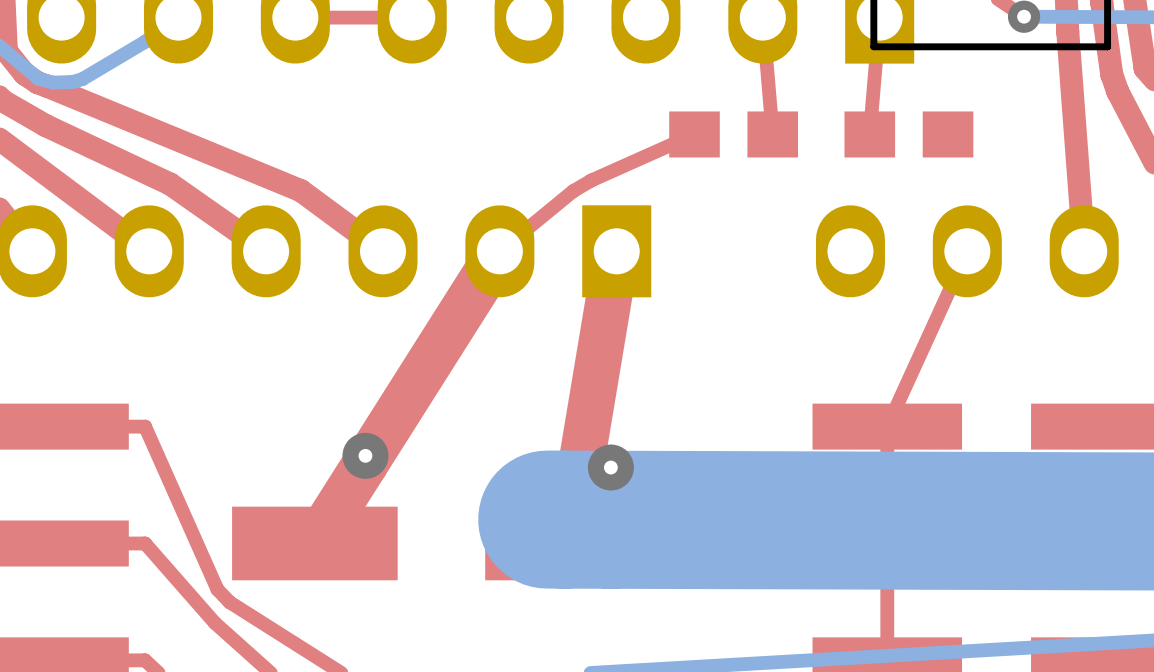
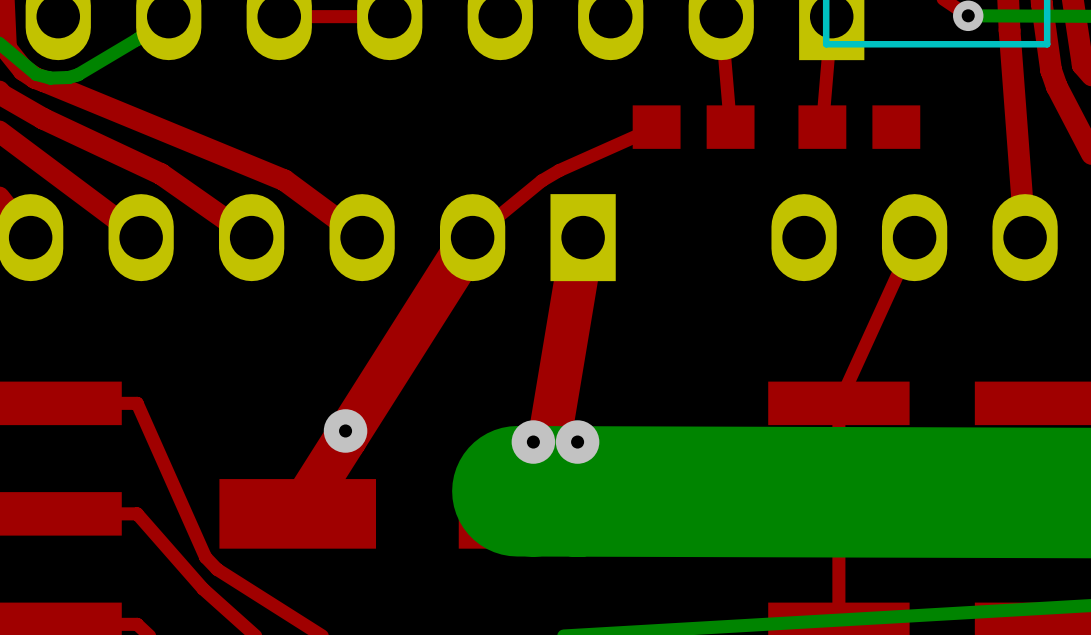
via: none -> (533, 442)

